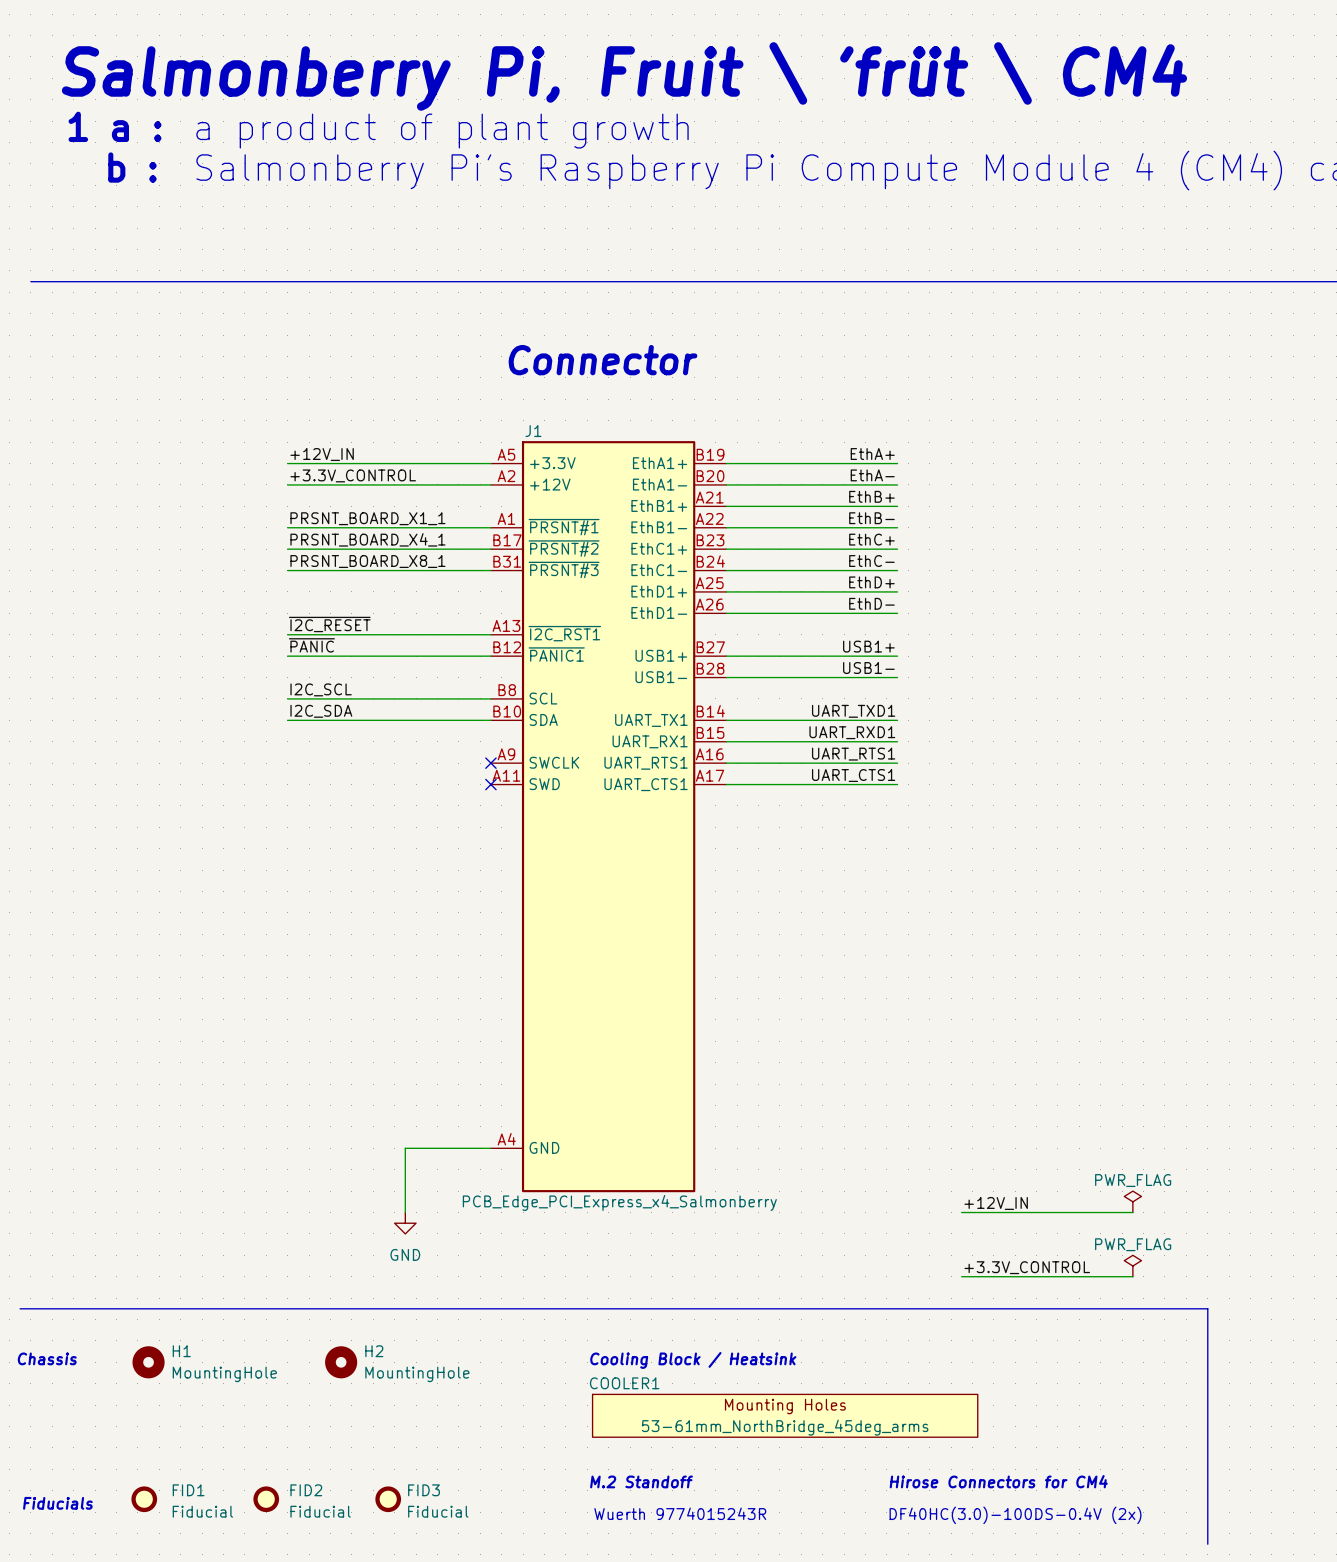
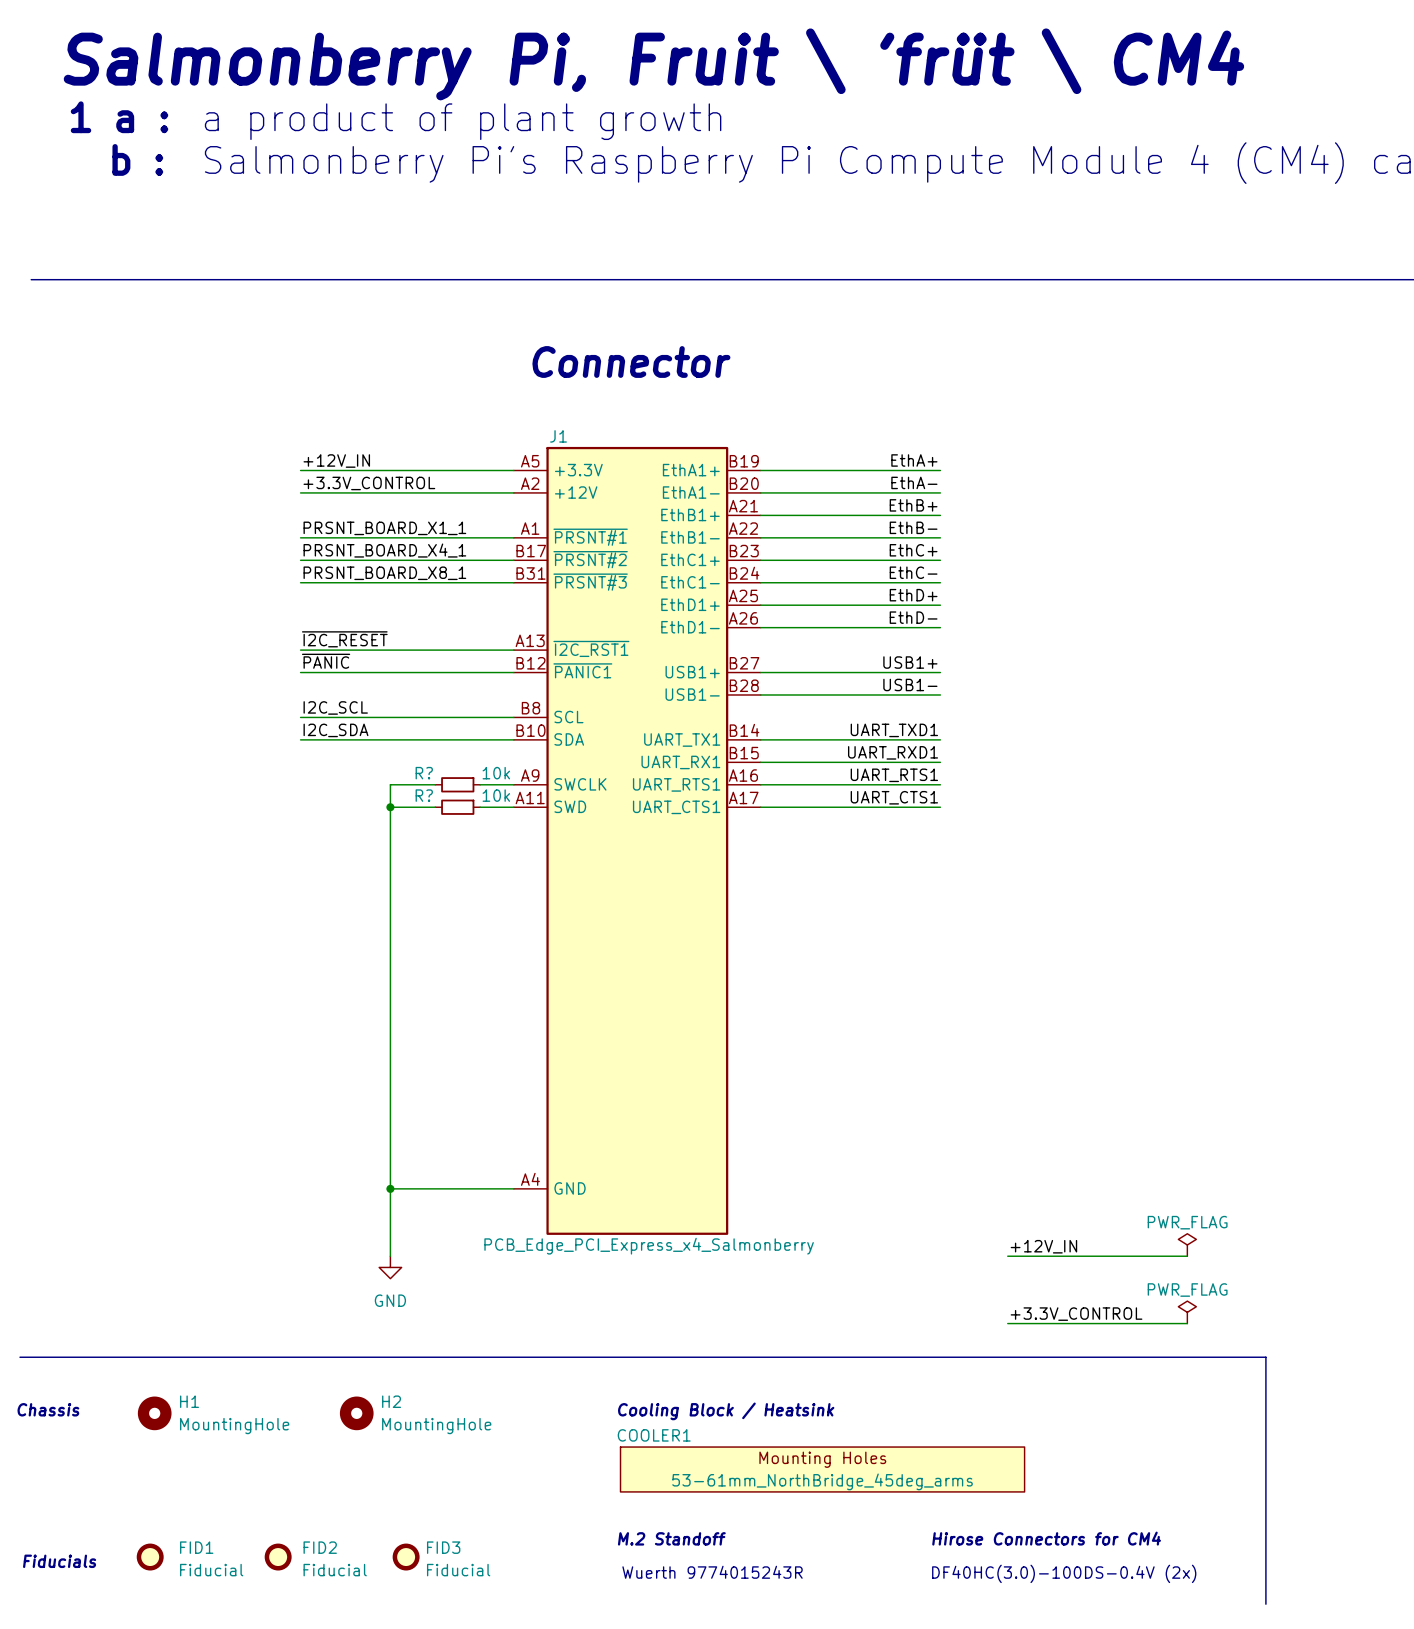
wire: none -> (435, 784) (390, 784) (390, 1256)
R?: none -> 10k (457, 784)
wire: none -> (480, 784) (513, 784)
no-connect mark: (490, 763) -> none
wire: none -> (390, 807) (435, 807)
junction: none -> (390, 807)
R?: none -> 10k (457, 807)
wire: none -> (480, 807) (513, 807)
no-connect mark: (490, 784) -> none
junction: none -> (390, 1188)
wire: (405, 1148) (405, 1212) -> (424, 1188) (390, 1188)
power symbol position: GND (405, 1223) -> GND (390, 1267)

